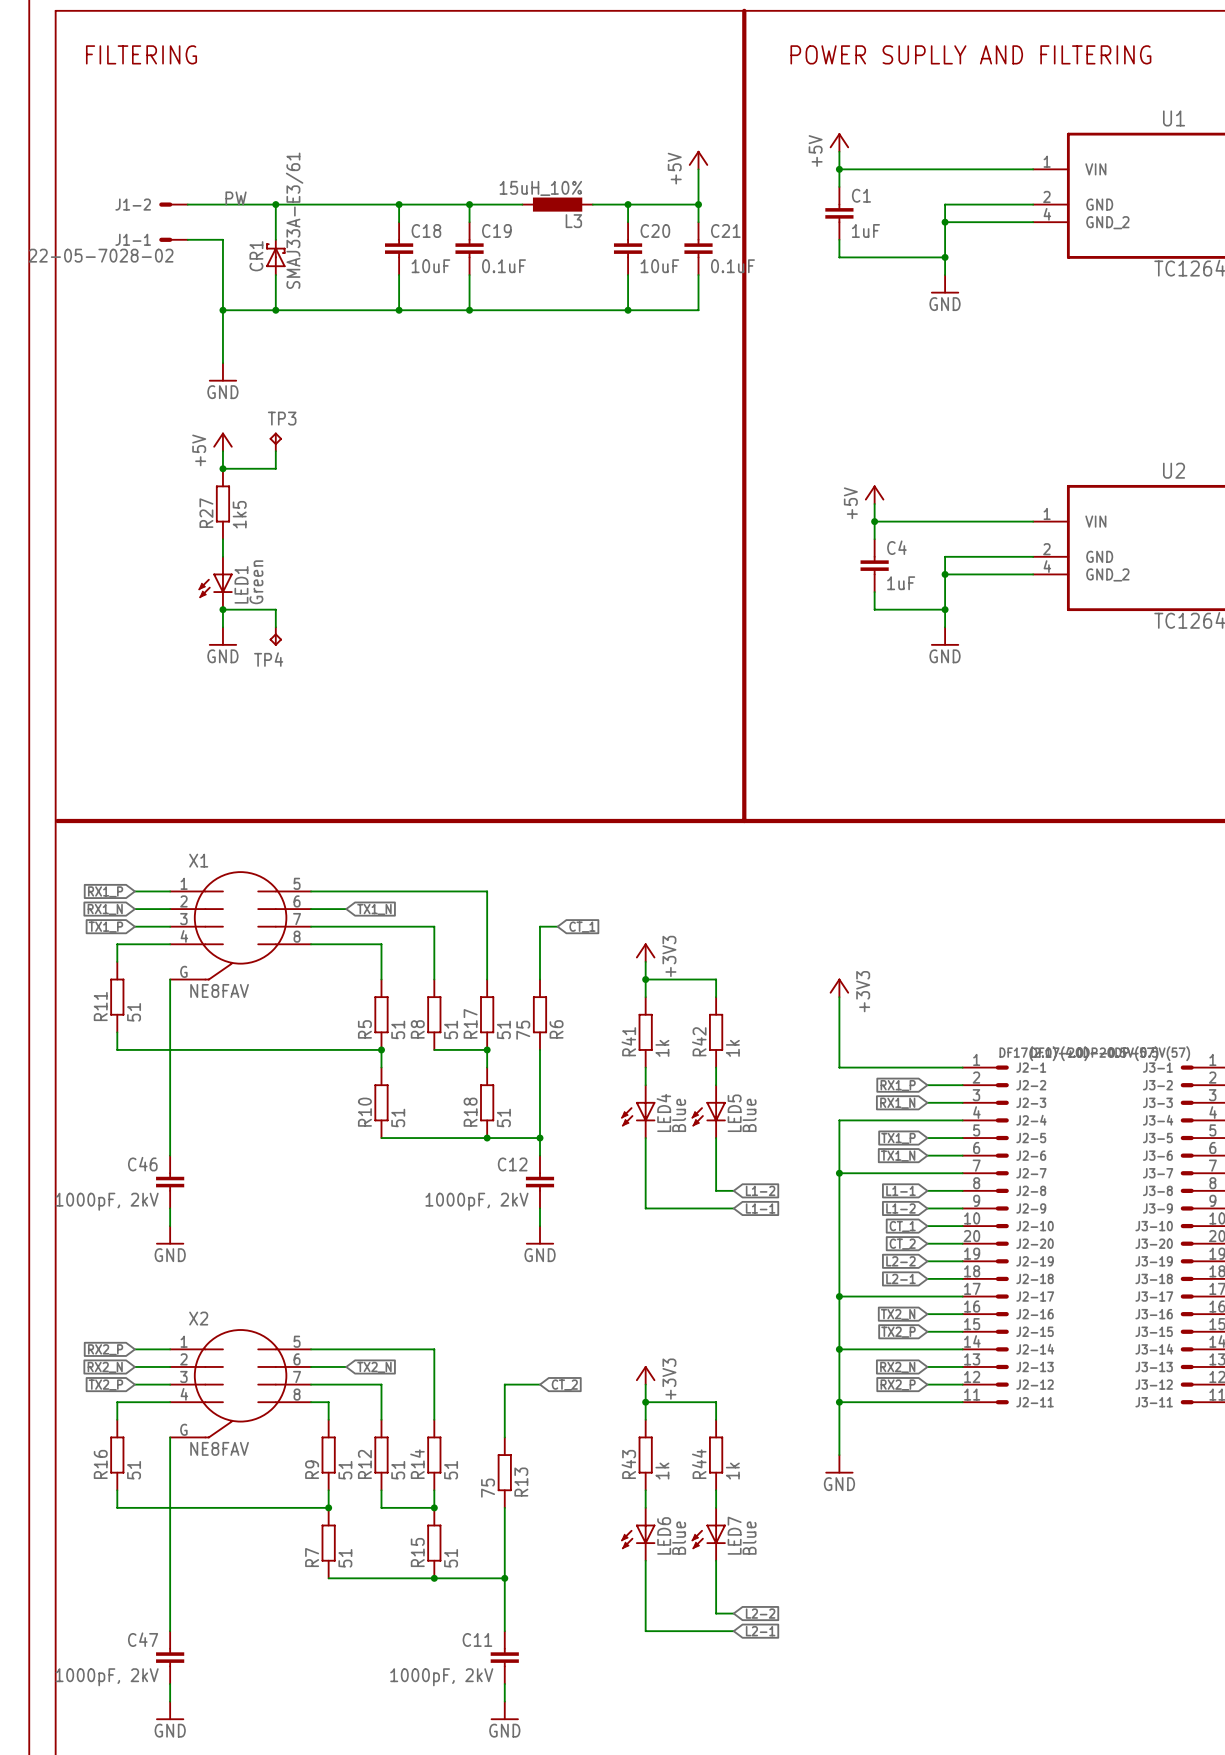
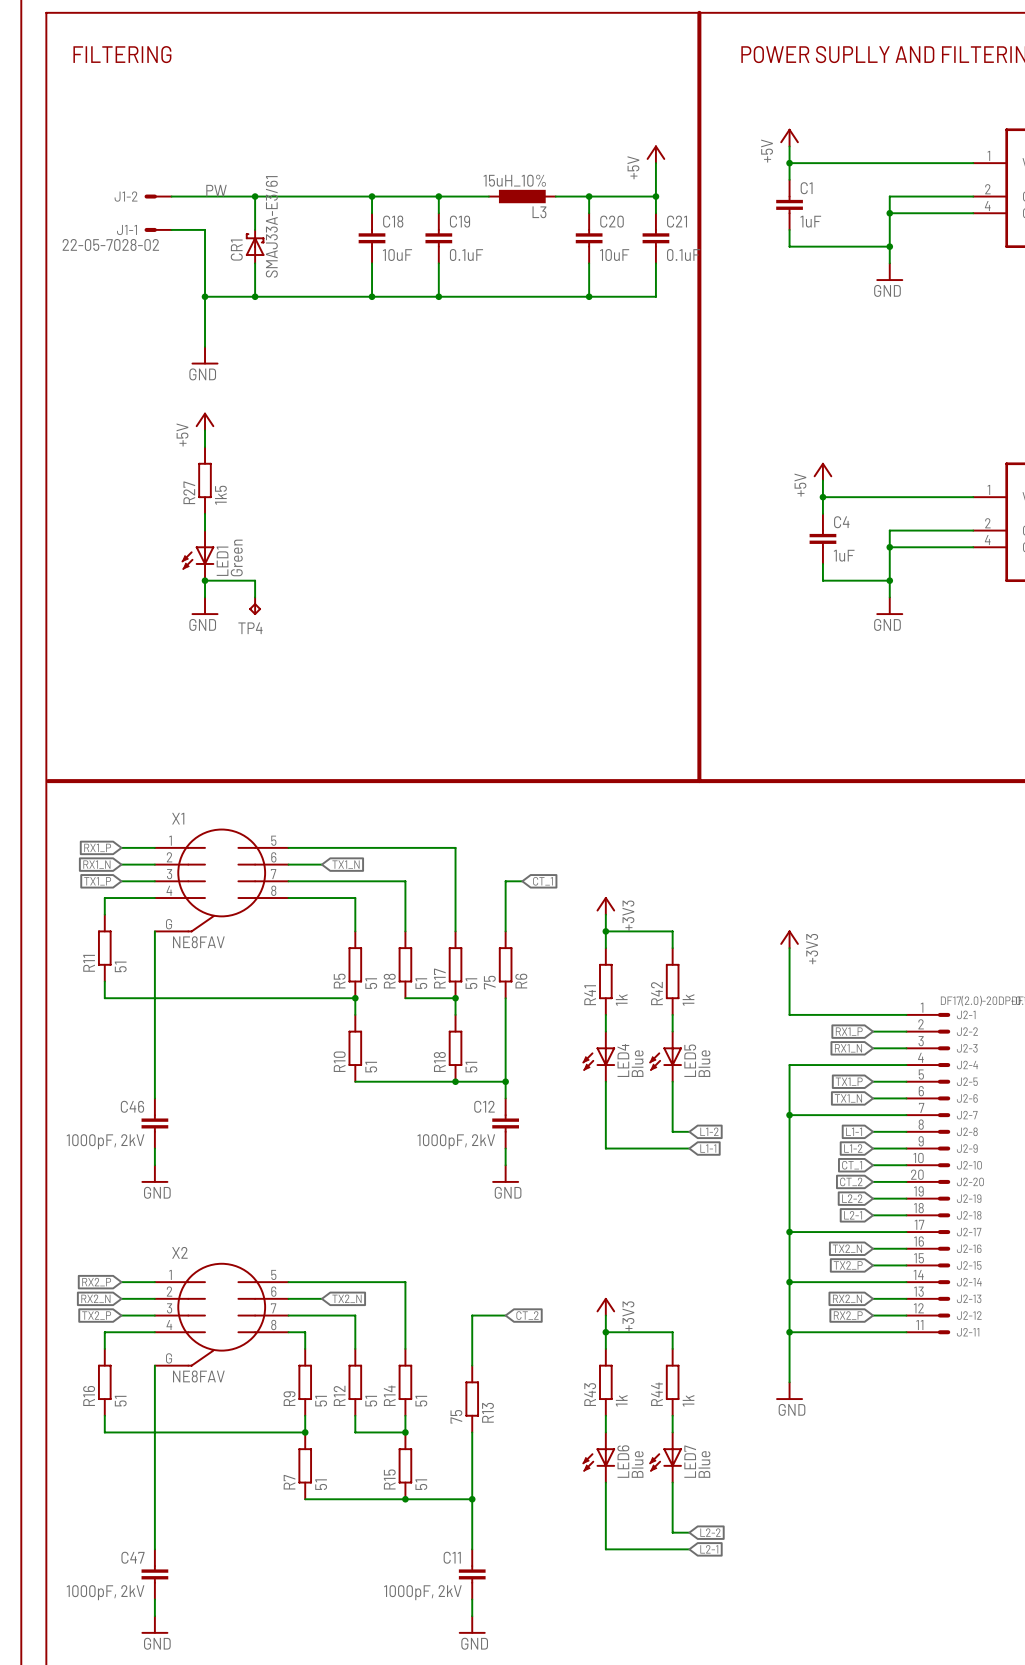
TP3: (275, 441) -> none
wire: (275, 451) (275, 468) (222, 468) -> none
junction: (222, 468) -> none

